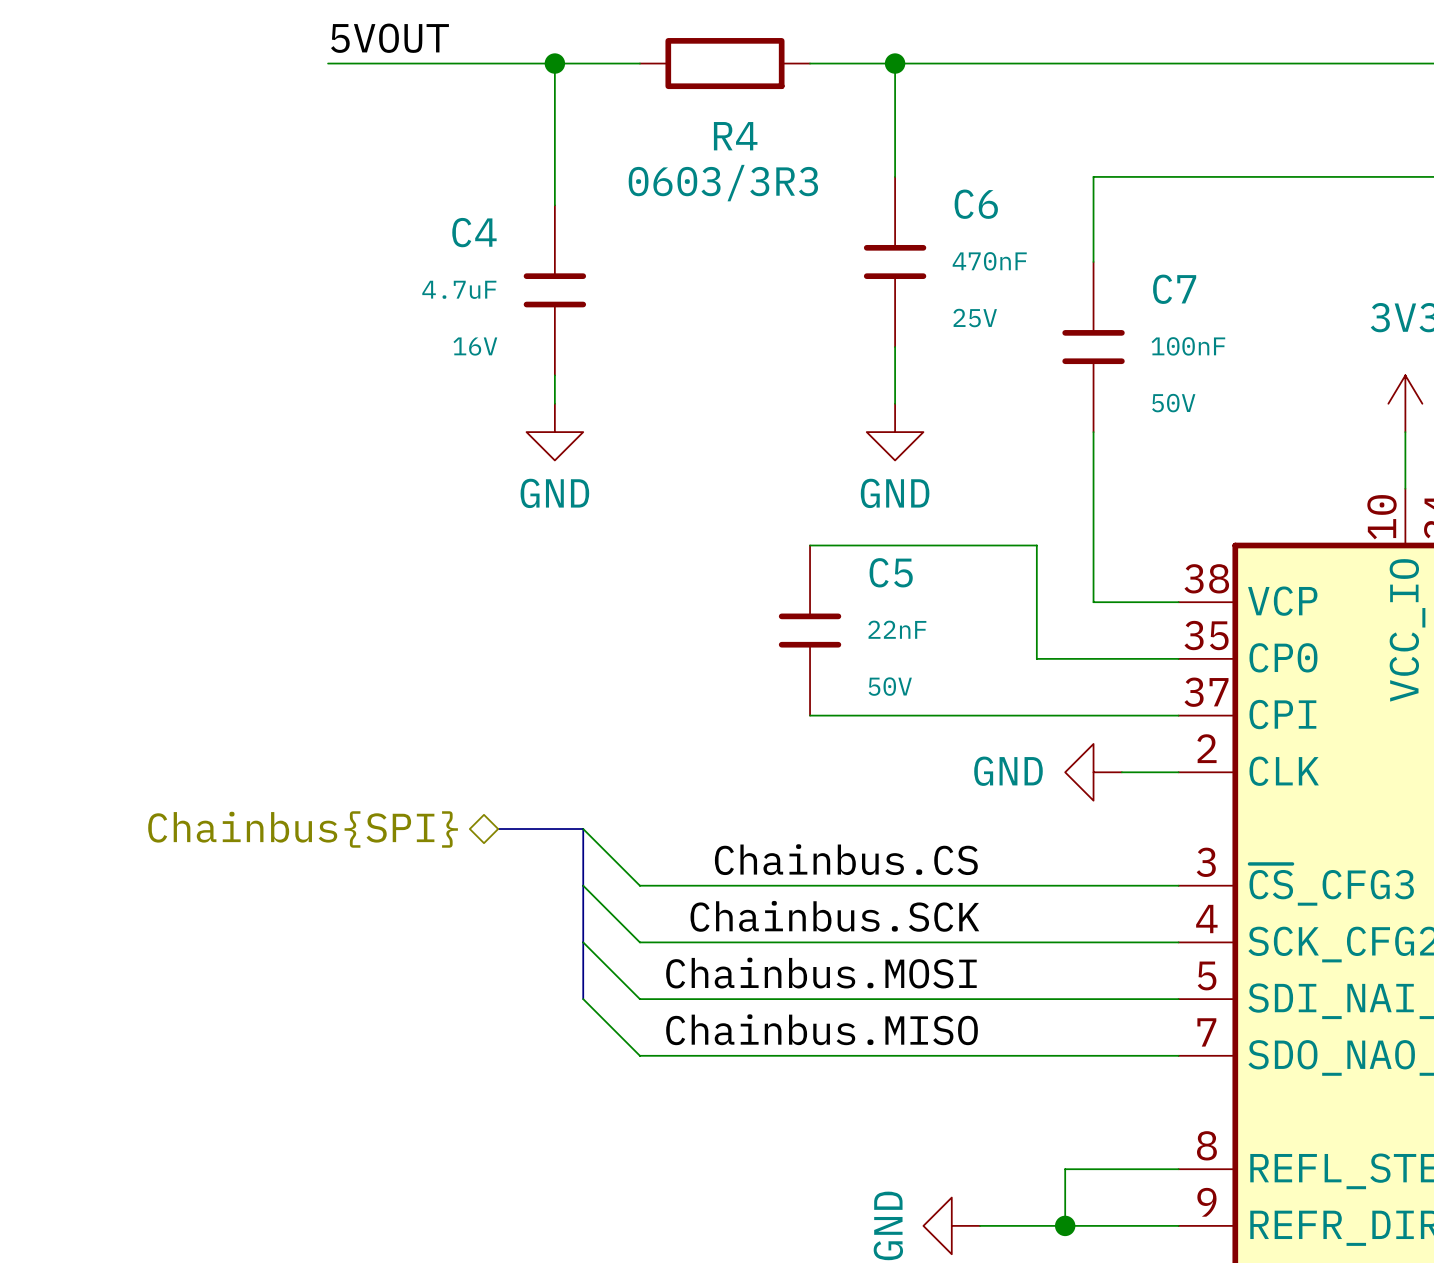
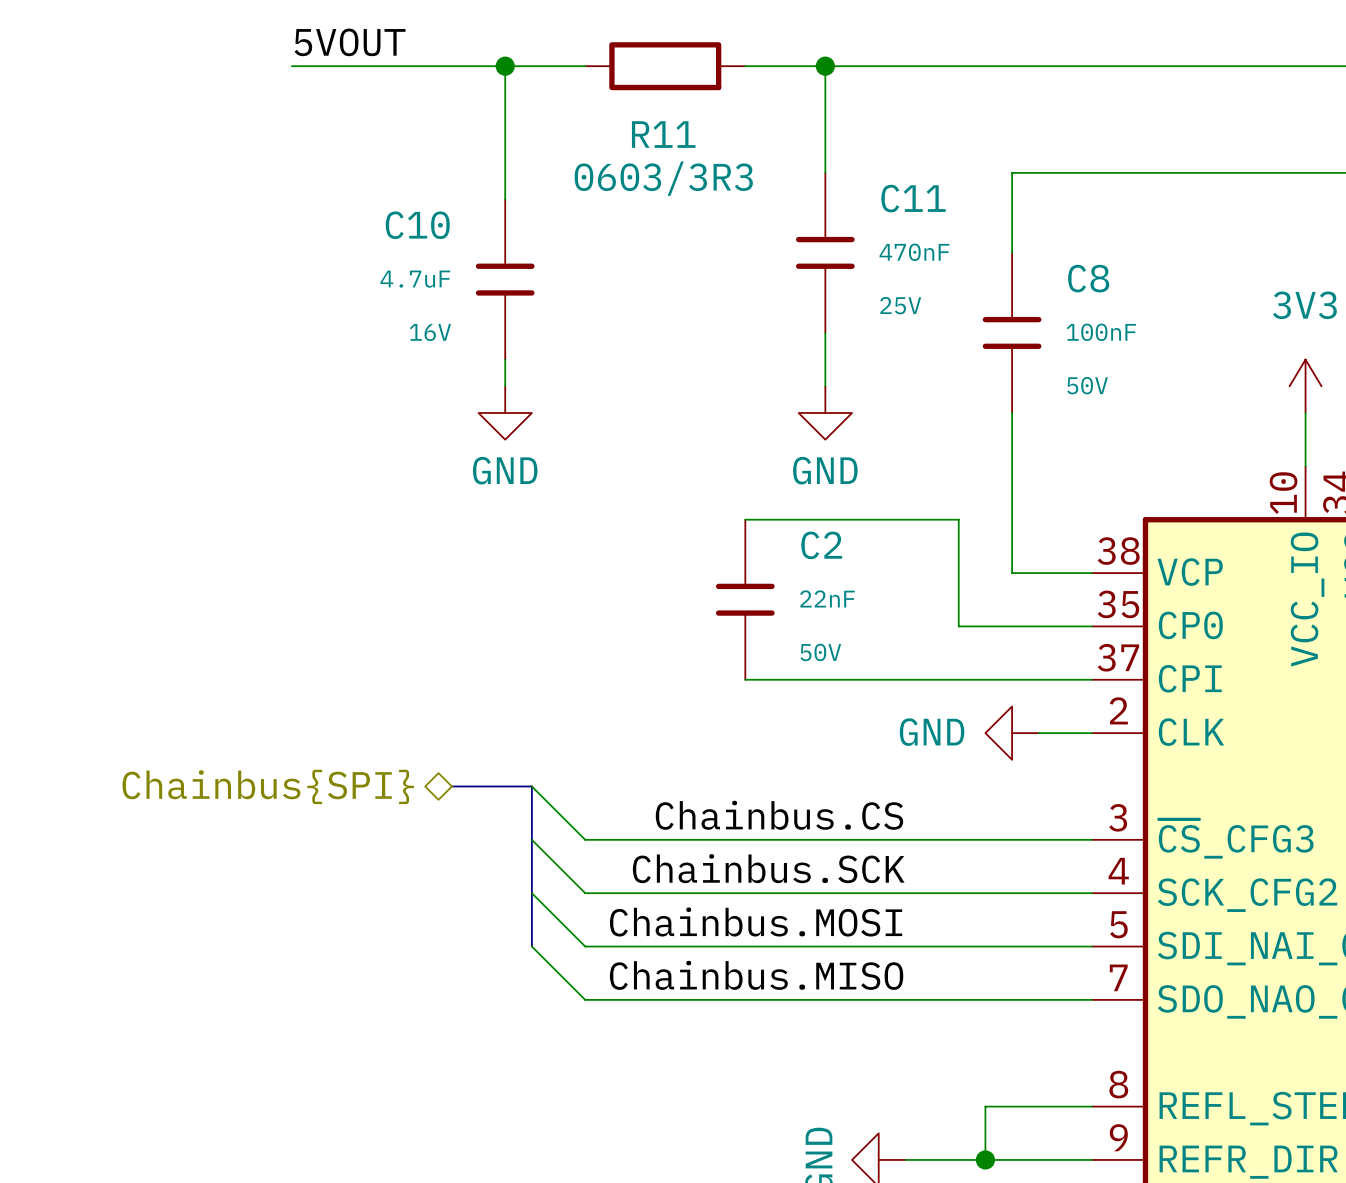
R4 name: R4 (735, 136) -> R11 (663, 134)
C6 name: C6 (976, 204) -> C11 (913, 198)
C4 name: C4 (474, 232) -> C10 (417, 225)
C7 name: C7 (1174, 289) -> C8 (1088, 278)
C5 name: C5 (891, 572) -> C2 (821, 545)

